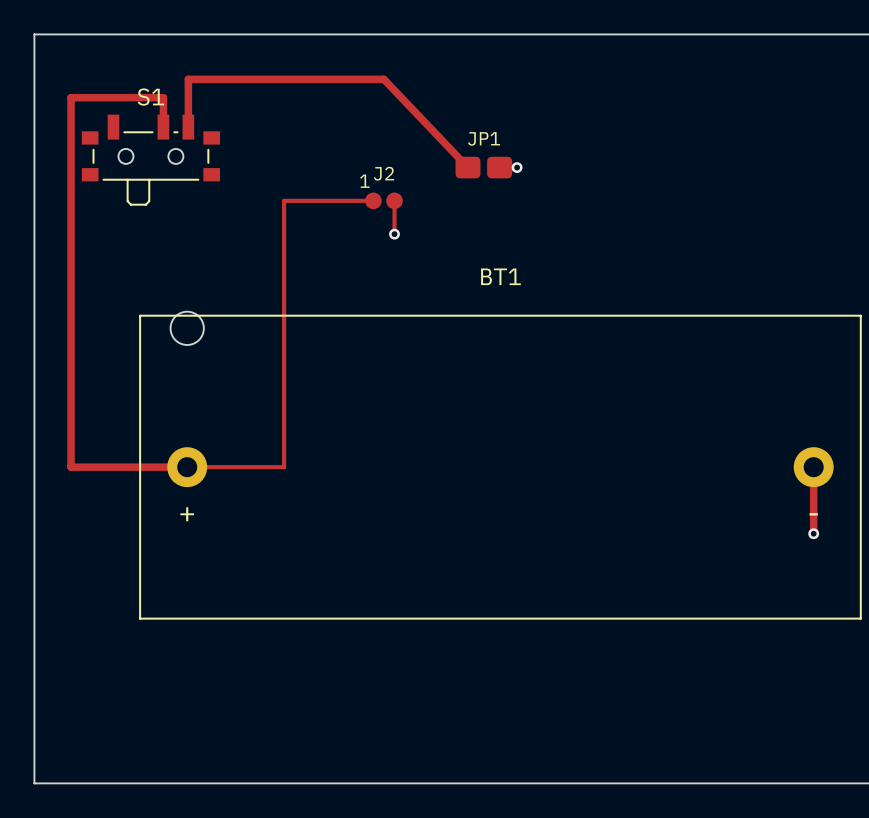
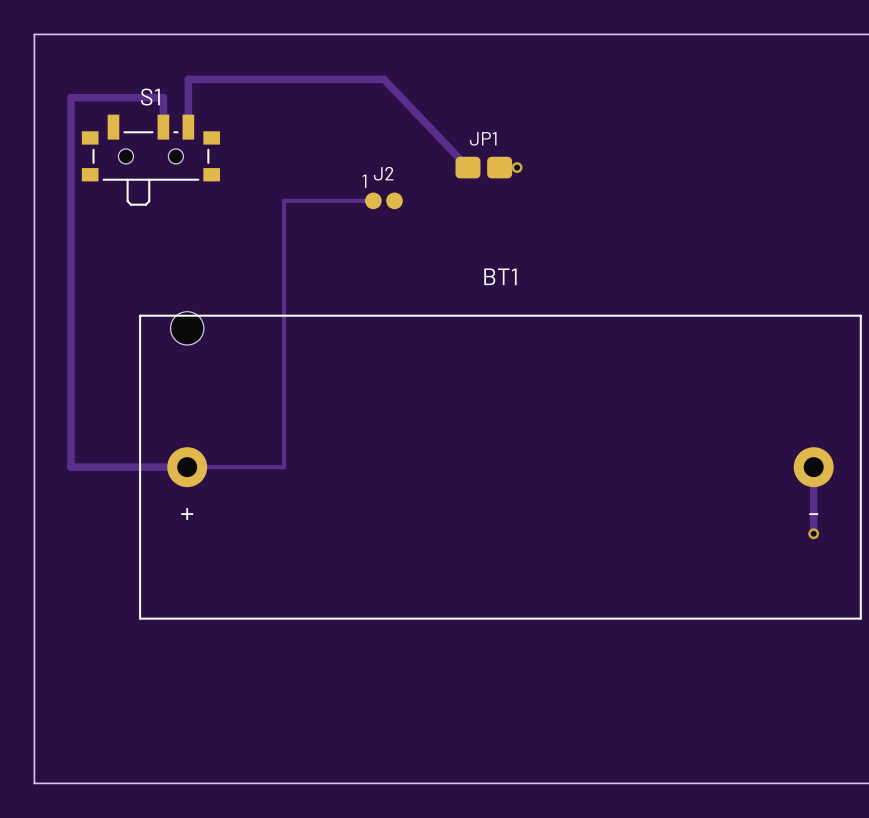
track: (394, 200) (394, 234) -> none
via: (394, 234) -> none

